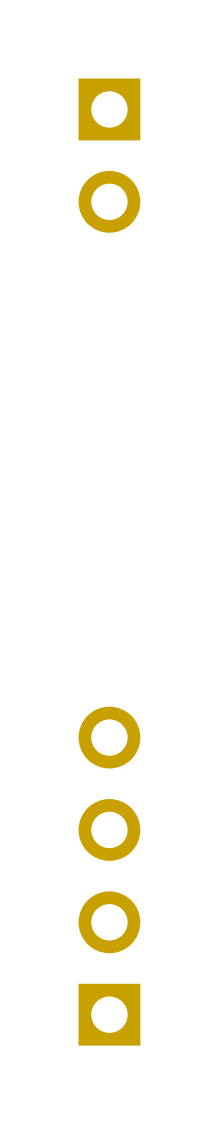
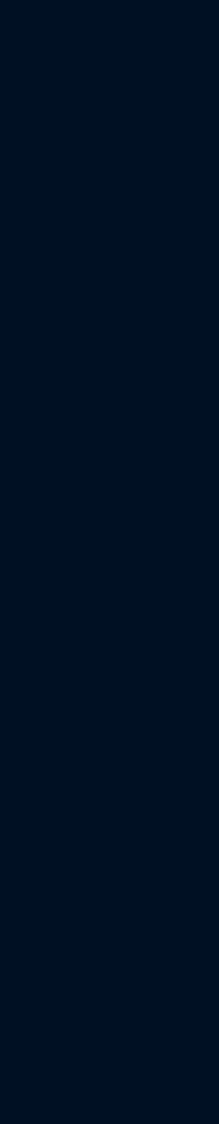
part: (109, 155) -> none
part: (109, 876) -> none

